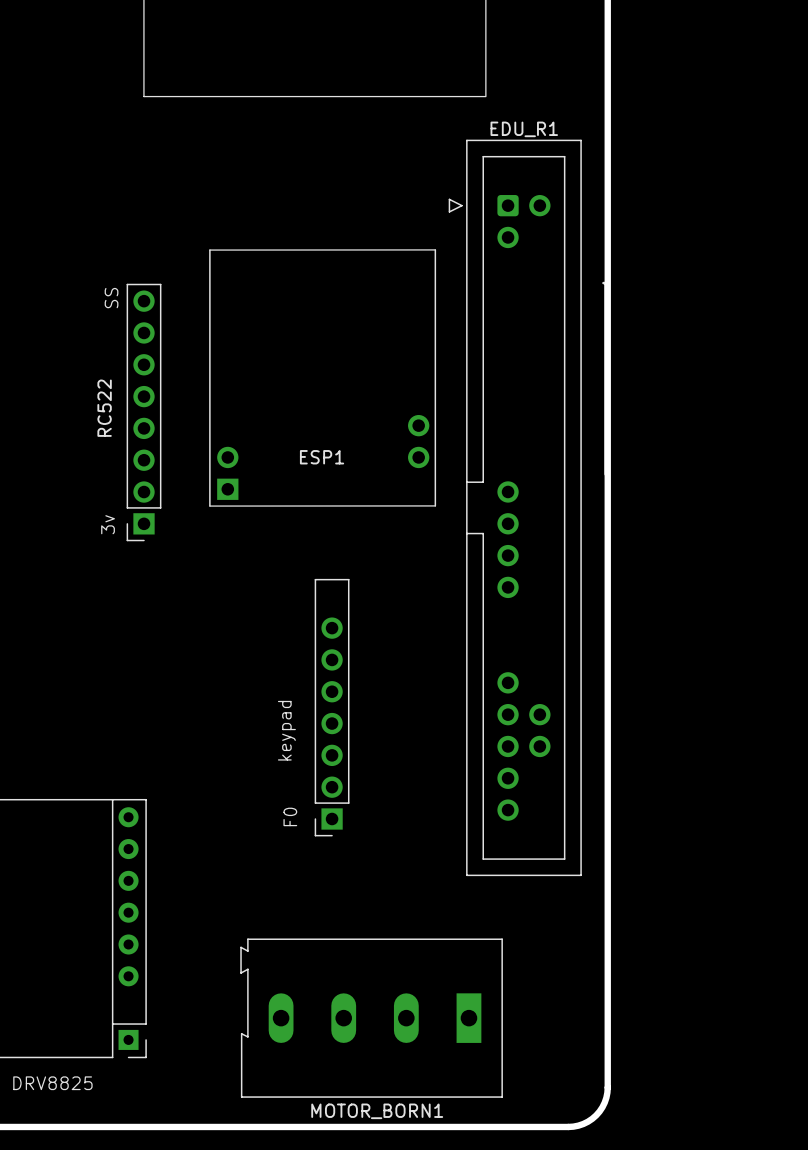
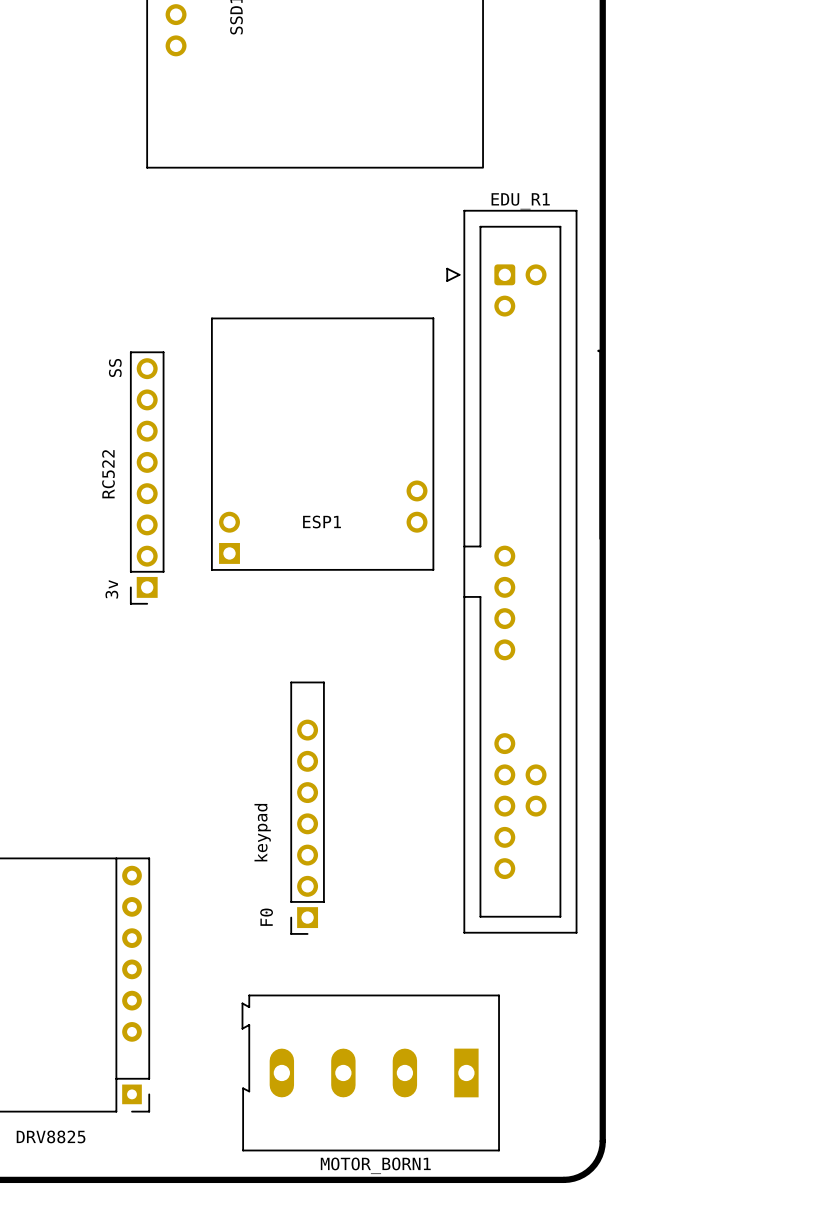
part position: (332, 707) -> (307, 808)

